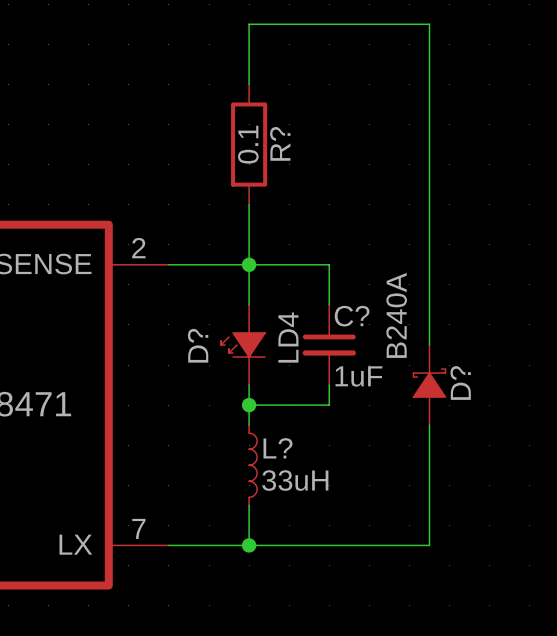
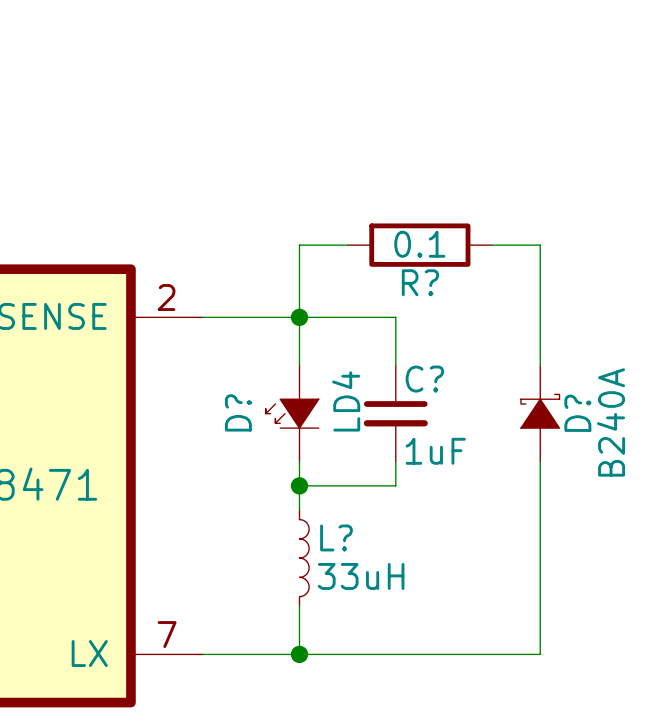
wire: (249, 84) (249, 24) (429, 24) (429, 344) -> none
R? rotation: 0° (249, 144) -> 90° clockwise (419, 245)
R? position: (249, 144) -> (419, 245)
wire: none -> (299, 245) (347, 245)
wire: none -> (492, 245) (540, 245) (540, 365)
D? value position: B240A (396, 315) -> B240A (611, 422)
D? position: (429, 385) -> (540, 413)
wire: (429, 425) (429, 545) -> (540, 461) (540, 654) (516, 654)

